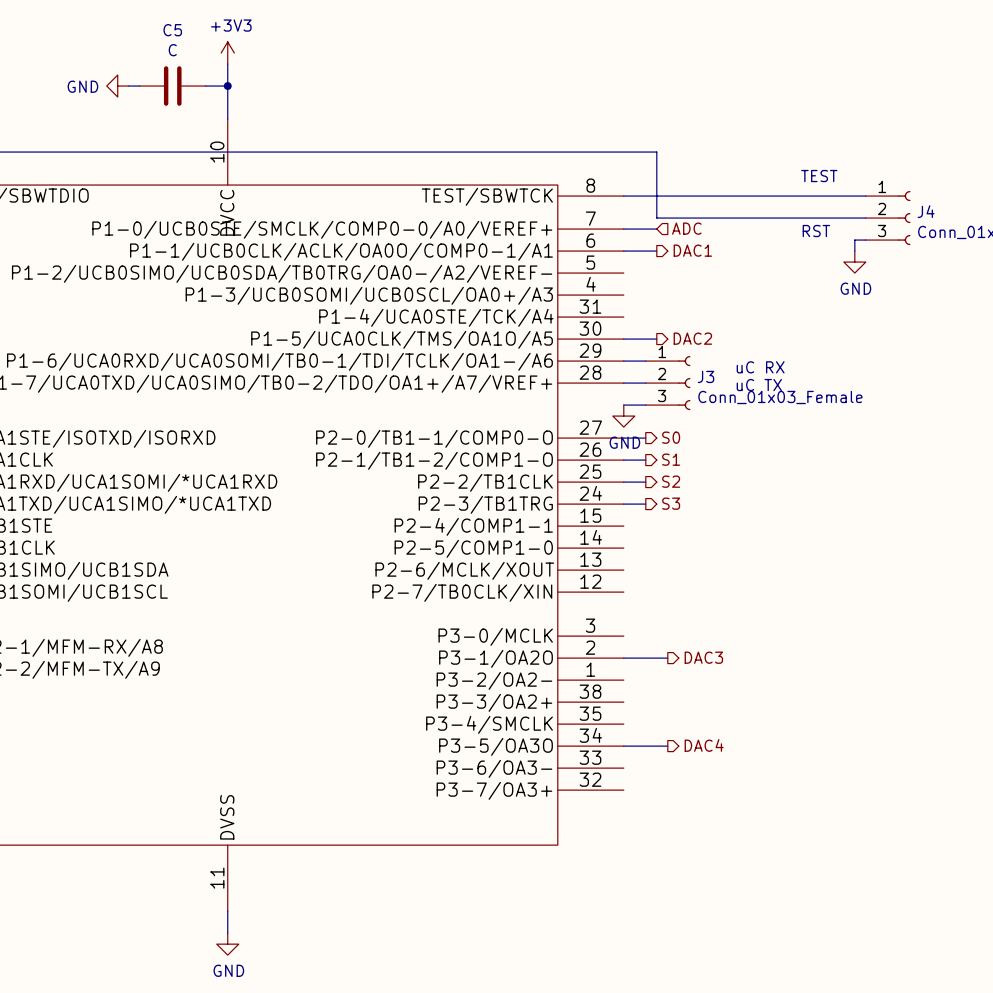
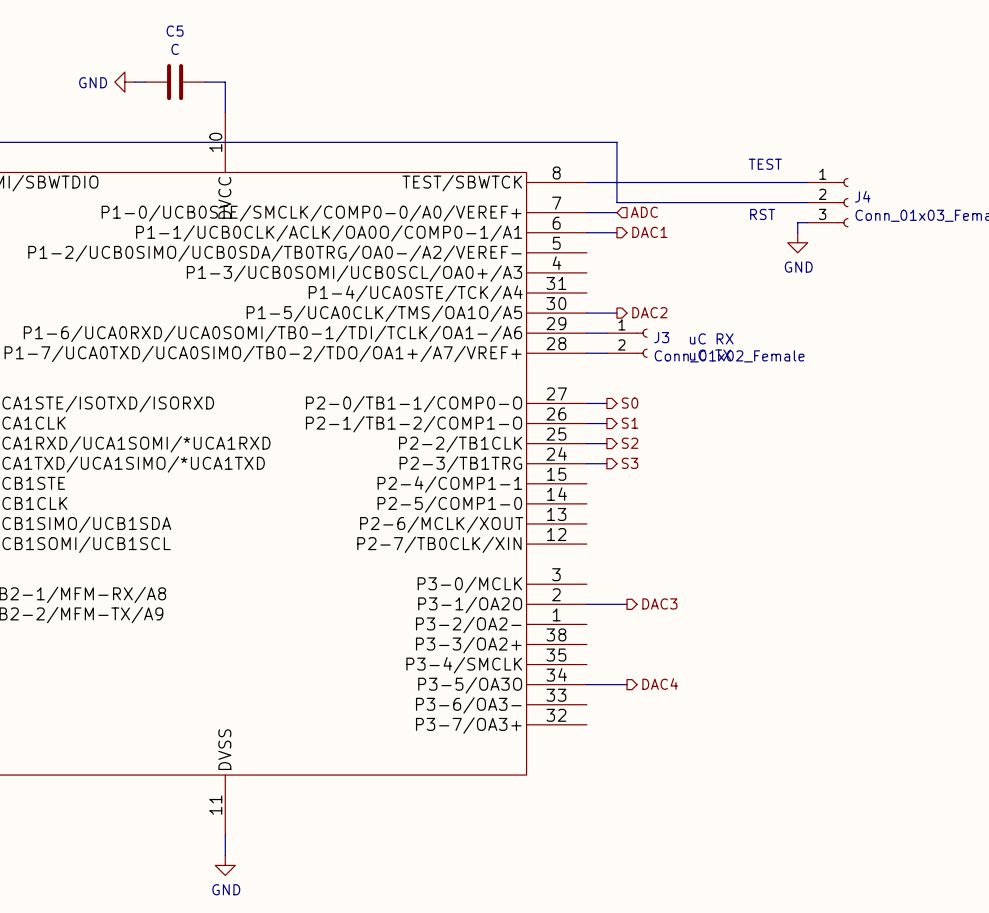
power symbol: +3V3 (227, 53) -> none
wire: (227, 64) (227, 86) -> none
junction: (227, 86) -> none
J3 symbol: [645, 356, 691, 411] -> [606, 328, 648, 358]
J3 value: Conn_01x03_Female (780, 397) -> Conn_01x02_Female (729, 356)
wire: (623, 405) (645, 405) -> none
power symbol: GND (623, 416) -> none

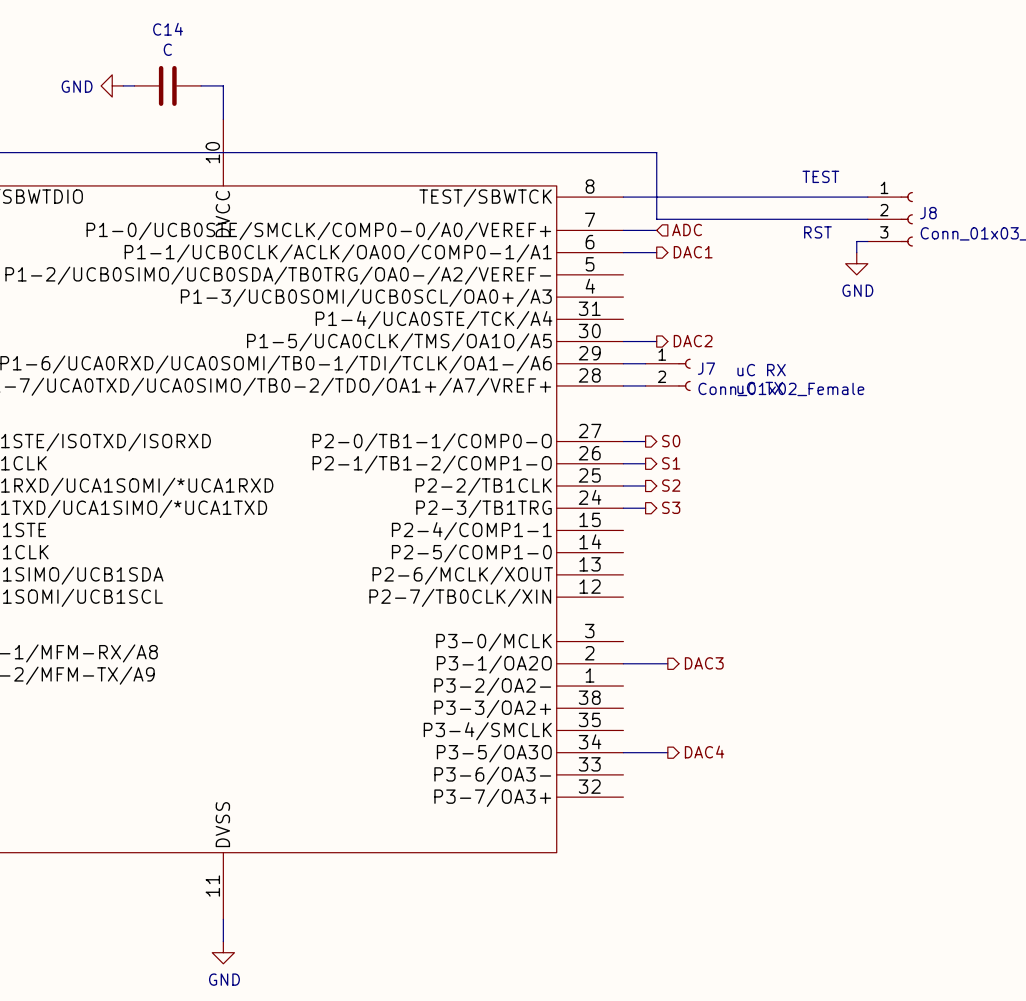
C5 name: C5 (175, 31) -> C14 (168, 29)
J4 name: J4 (862, 196) -> J8 (928, 213)
J3 name: J3 (661, 337) -> J7 (706, 368)

